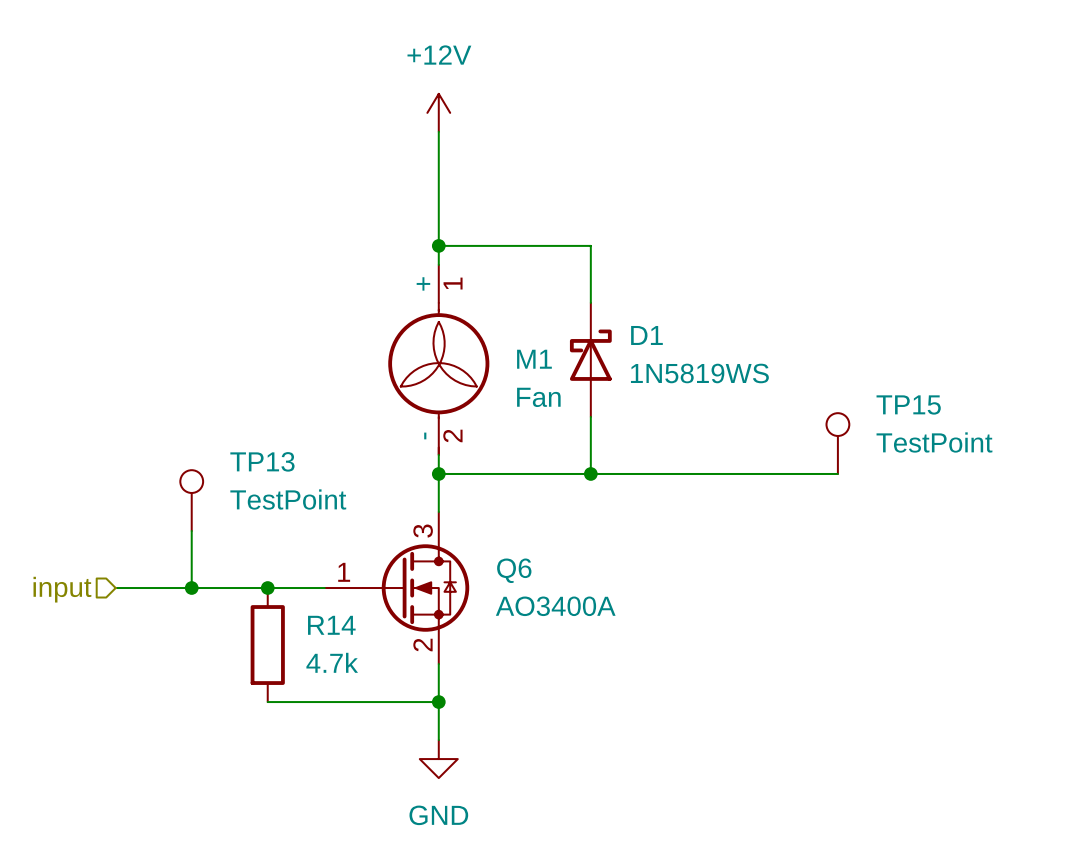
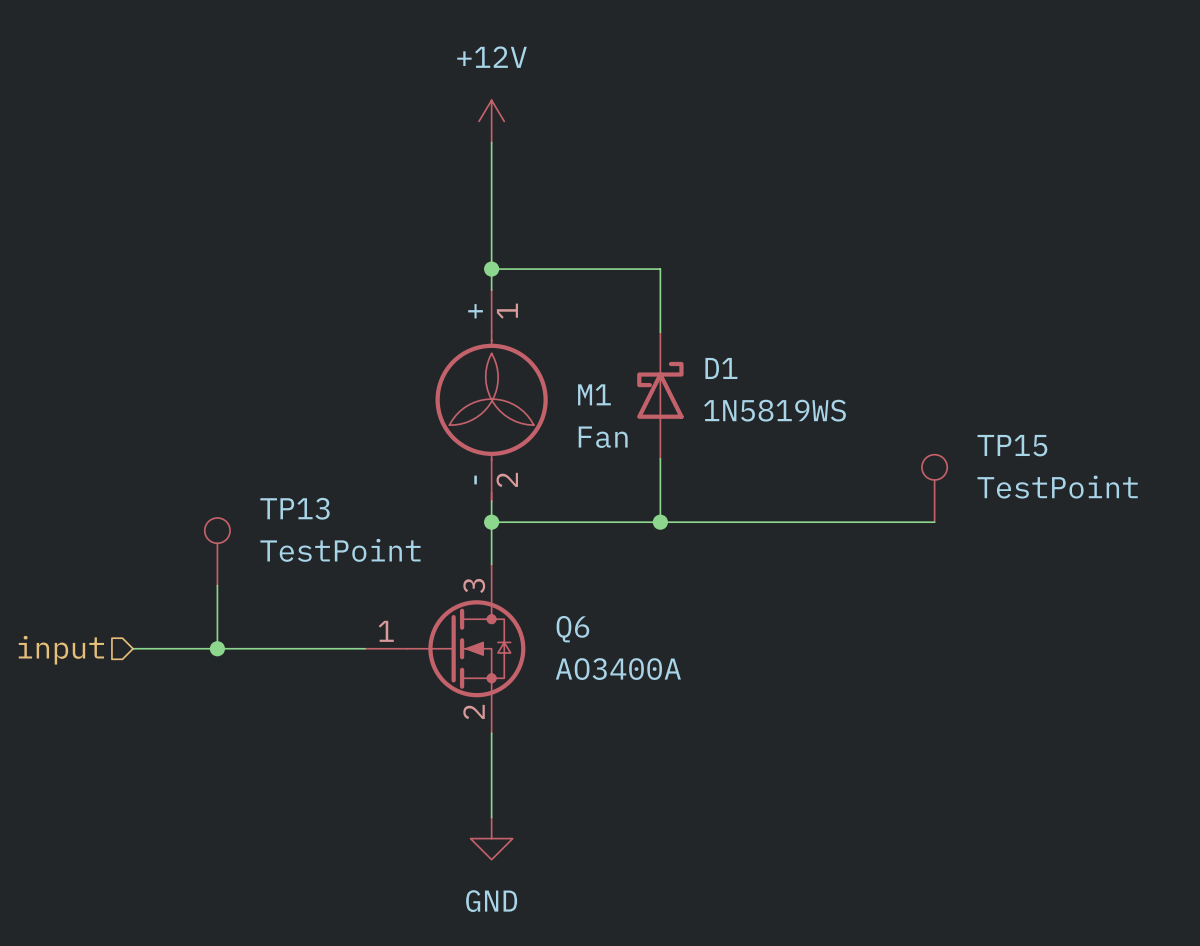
junction: (267, 588) -> none
R14: 4.7k (267, 645) -> none
wire: (267, 702) (438, 702) -> none
junction: (438, 702) -> none

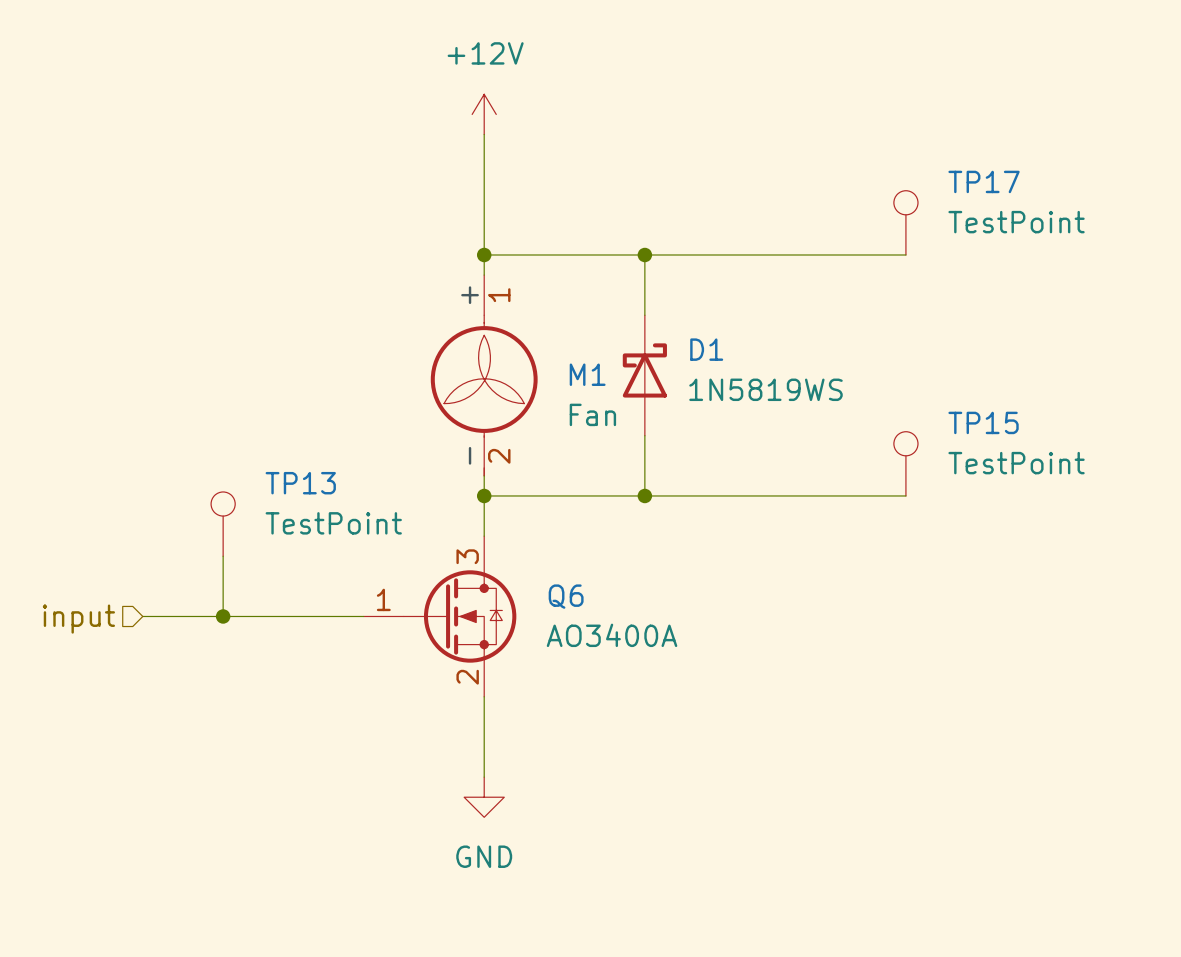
TP17: none -> TestPoint (905, 222)
wire: none -> (644, 254) (905, 254)
junction: none -> (644, 254)

